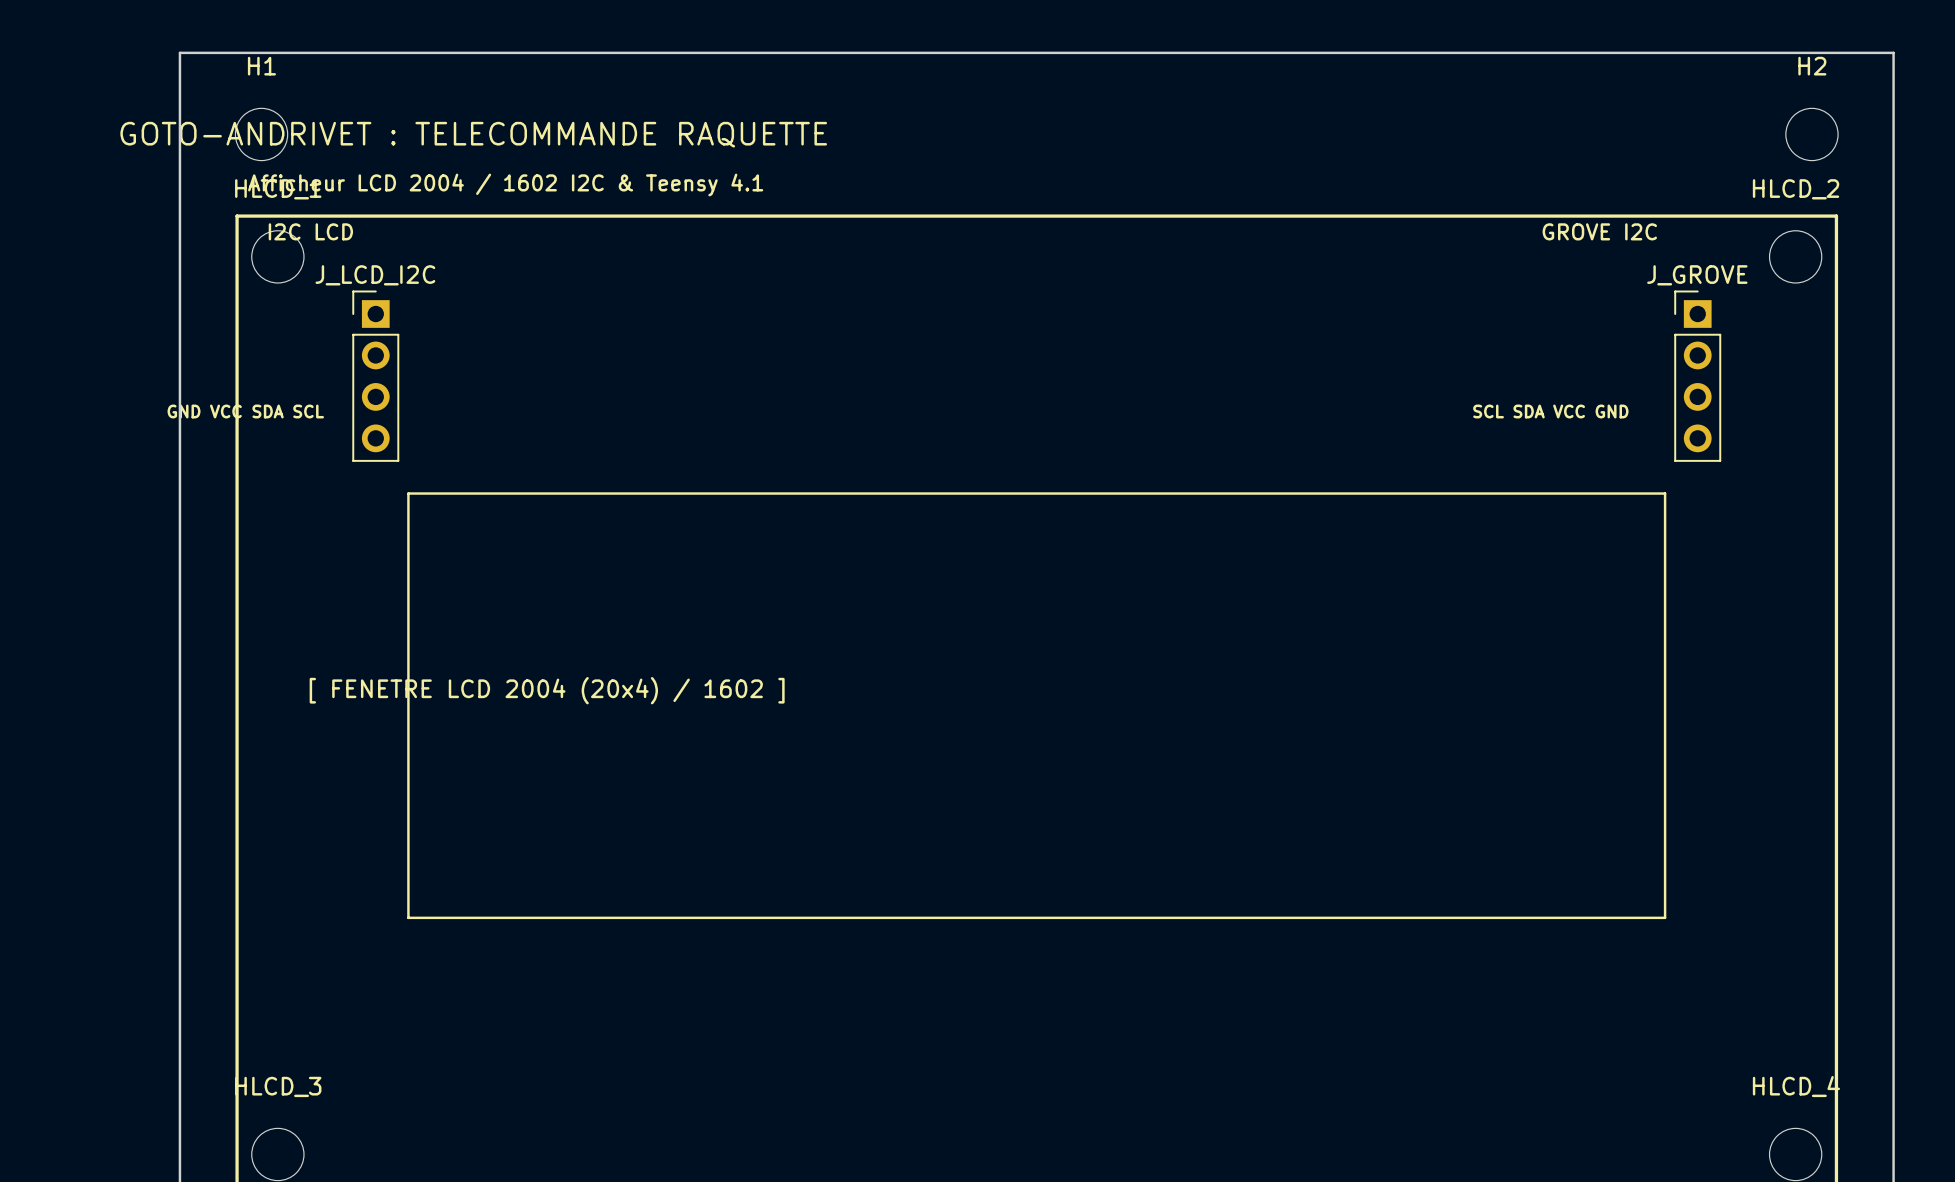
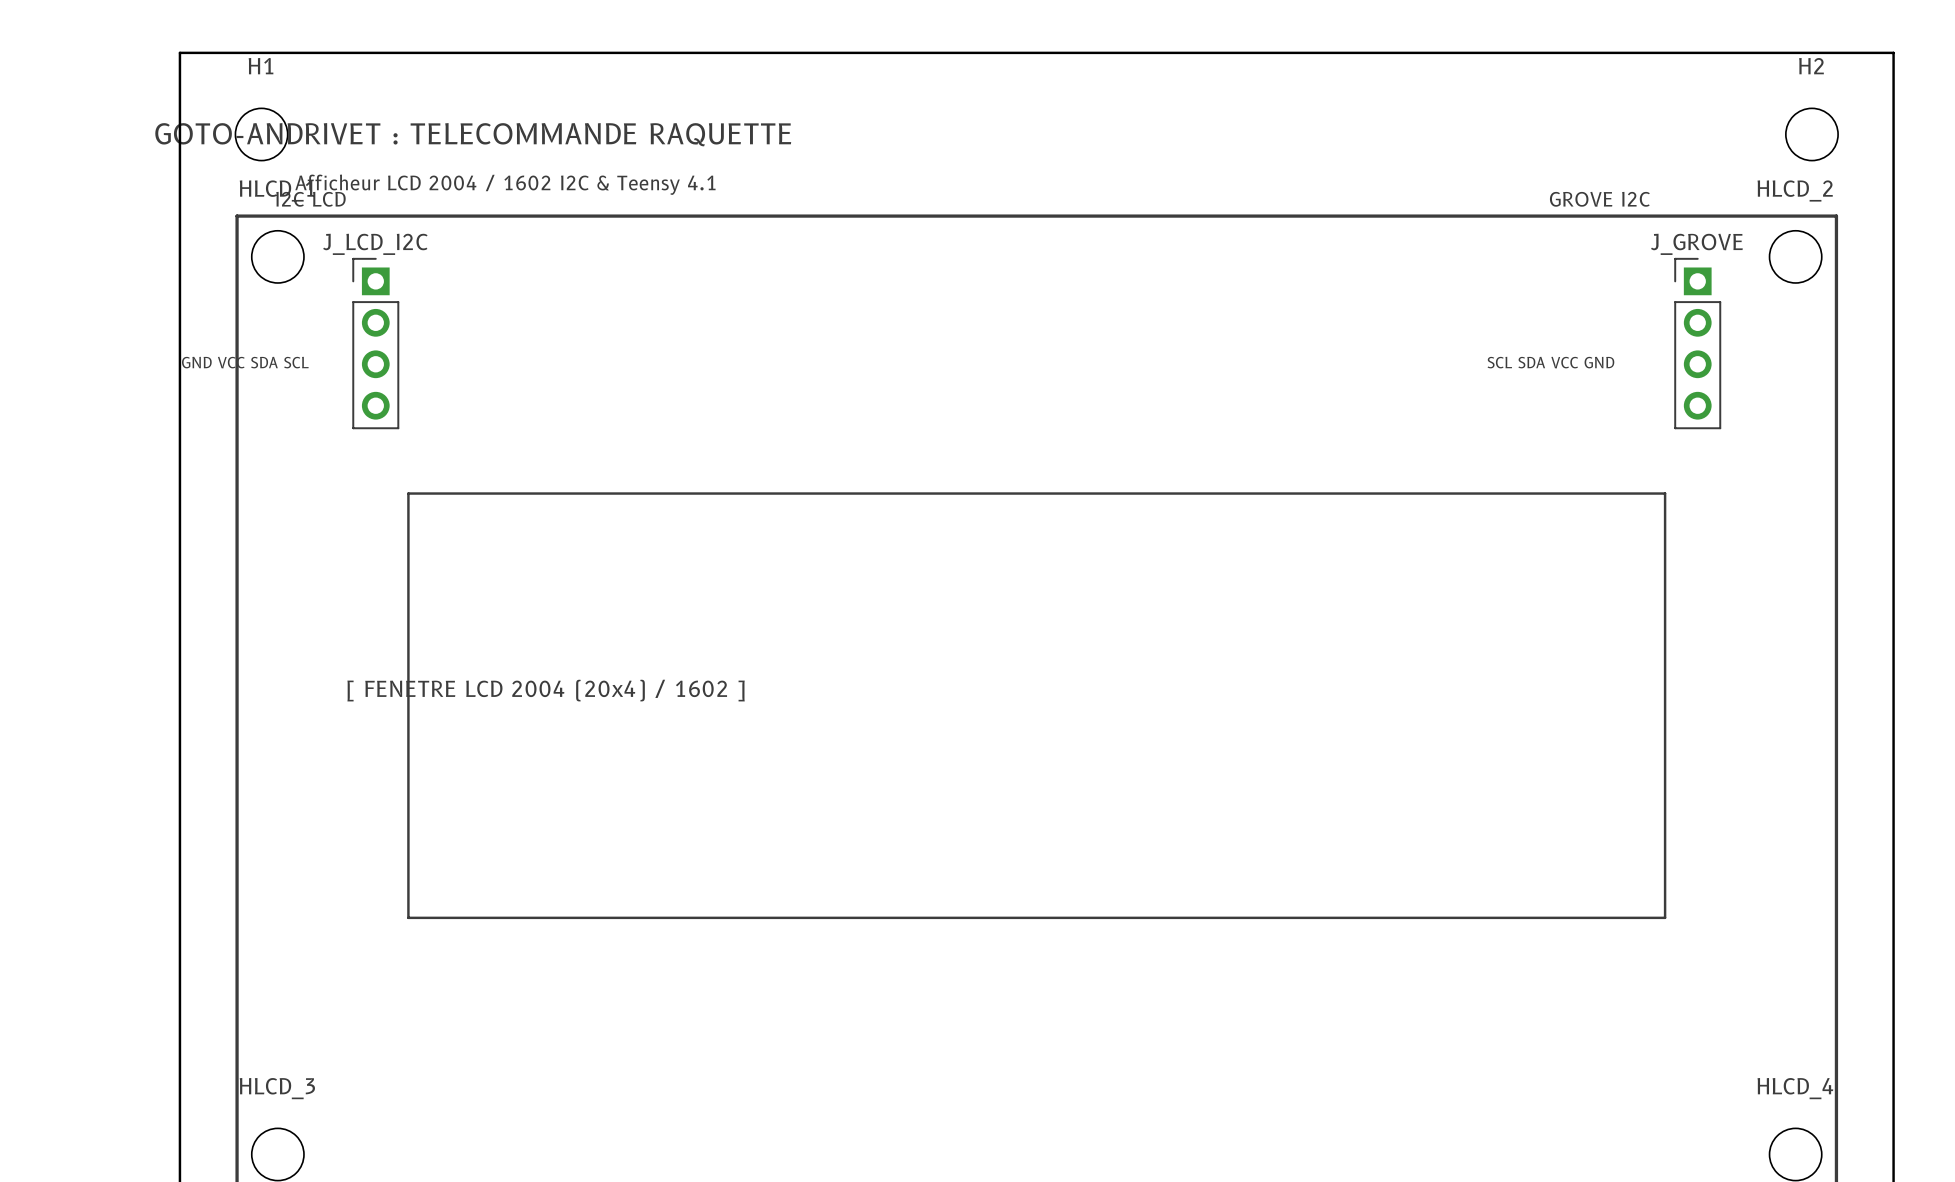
text position: I2C LCD (310, 231) -> I2C LCD (310, 199)
text position: GROVE I2C (1599, 231) -> GROVE I2C (1599, 199)
J_LCD_I2C position: (375, 376) -> (375, 343)
J_GROVE position: (1697, 376) -> (1697, 343)
text position: GND VCC SDA SCL (245, 411) -> GND VCC SDA SCL (245, 362)
text position: SCL SDA VCC GND (1550, 411) -> SCL SDA VCC GND (1550, 362)

